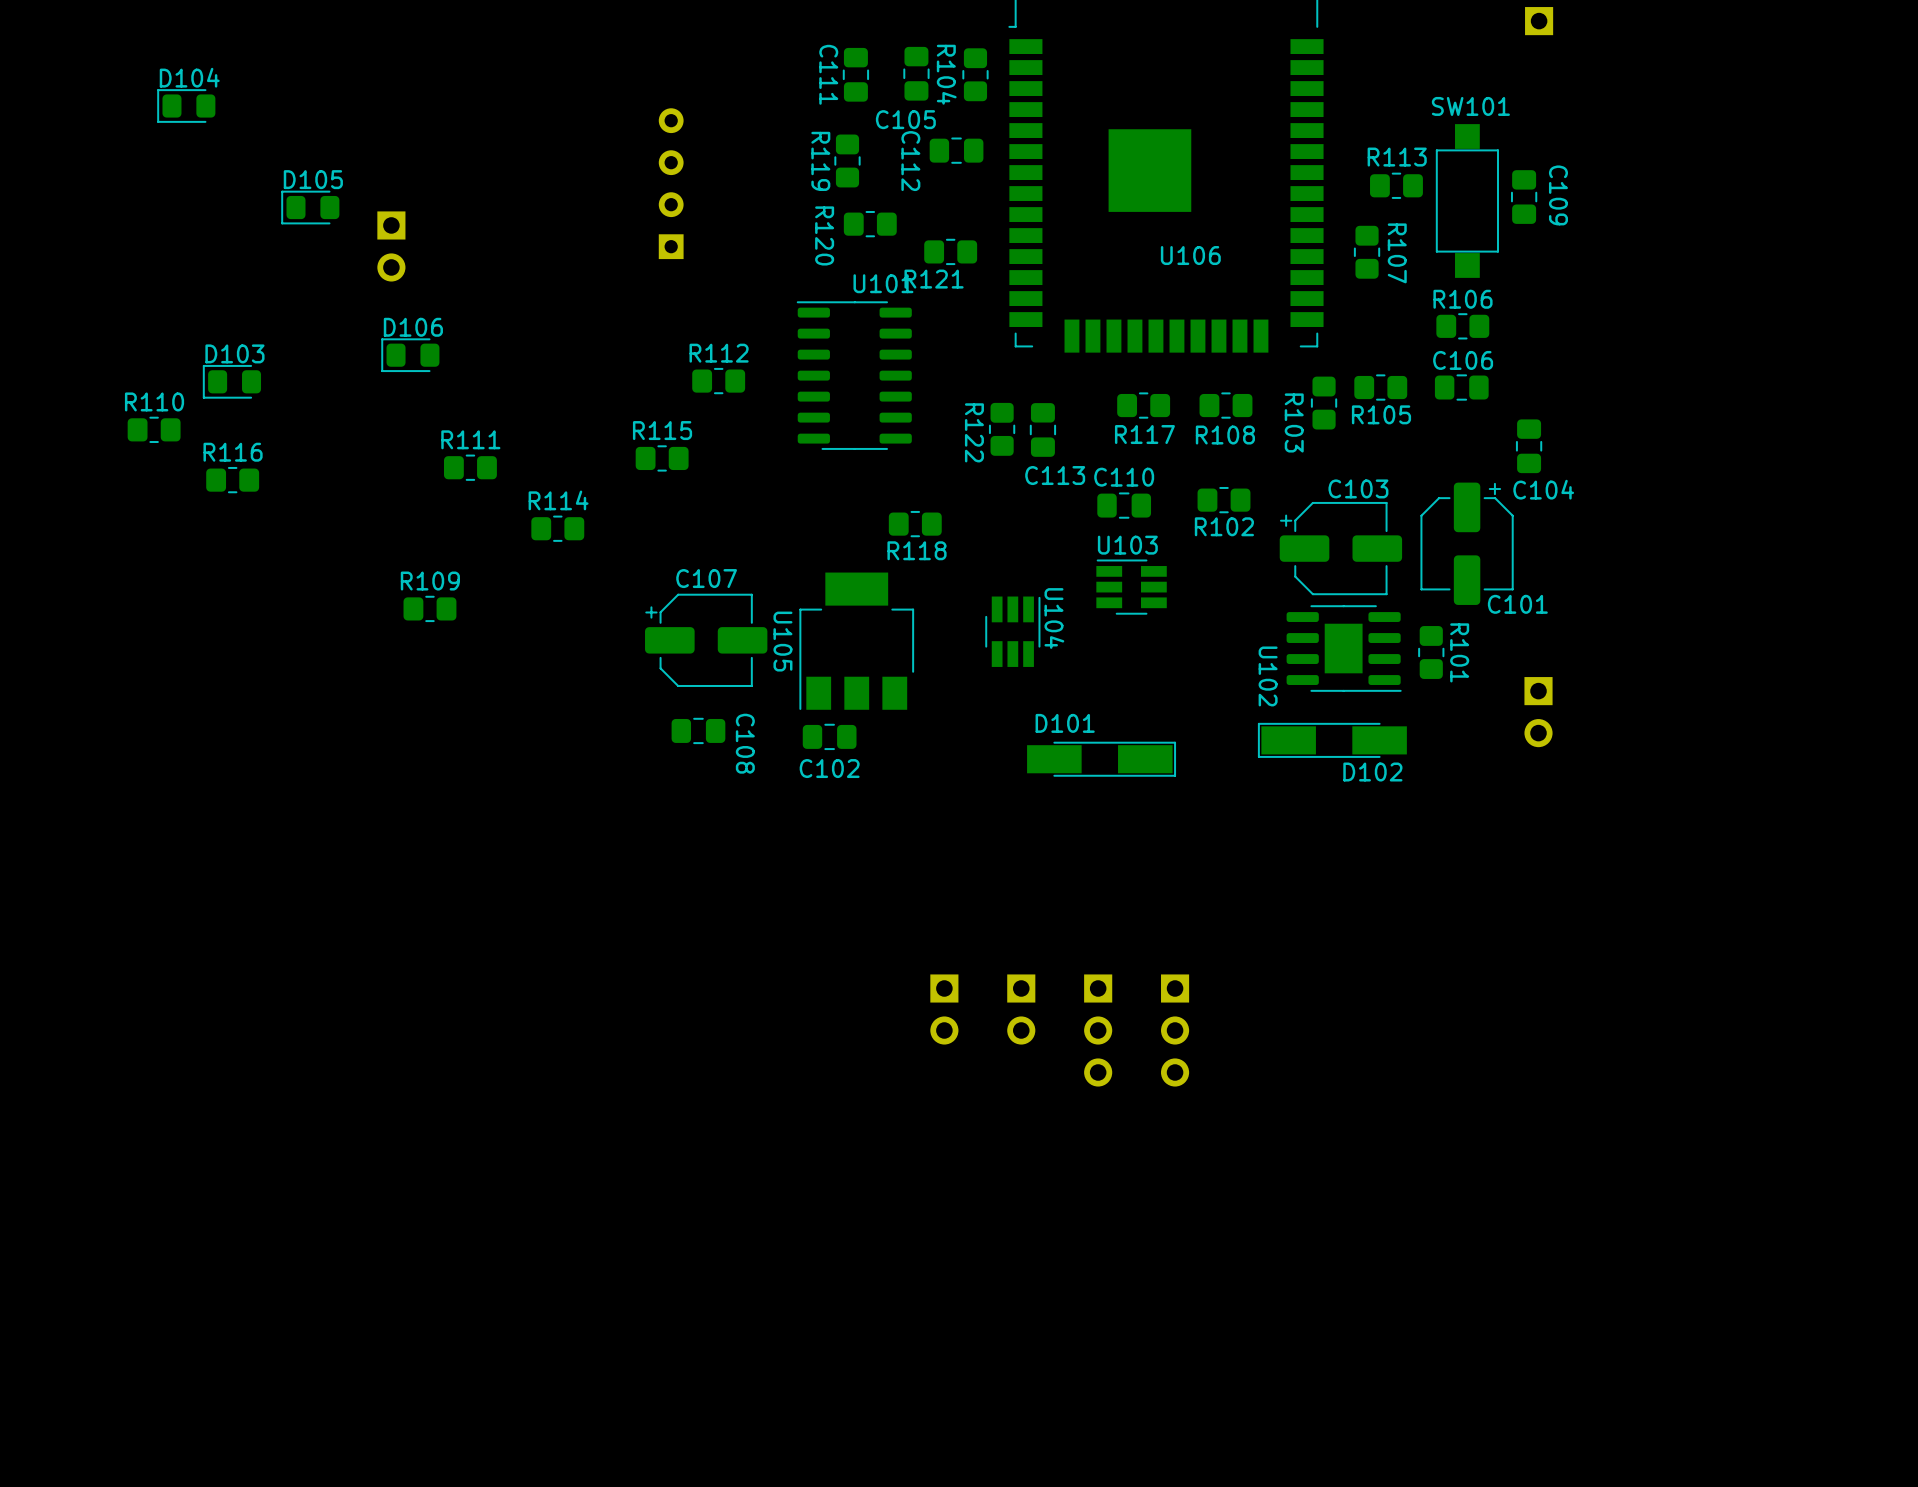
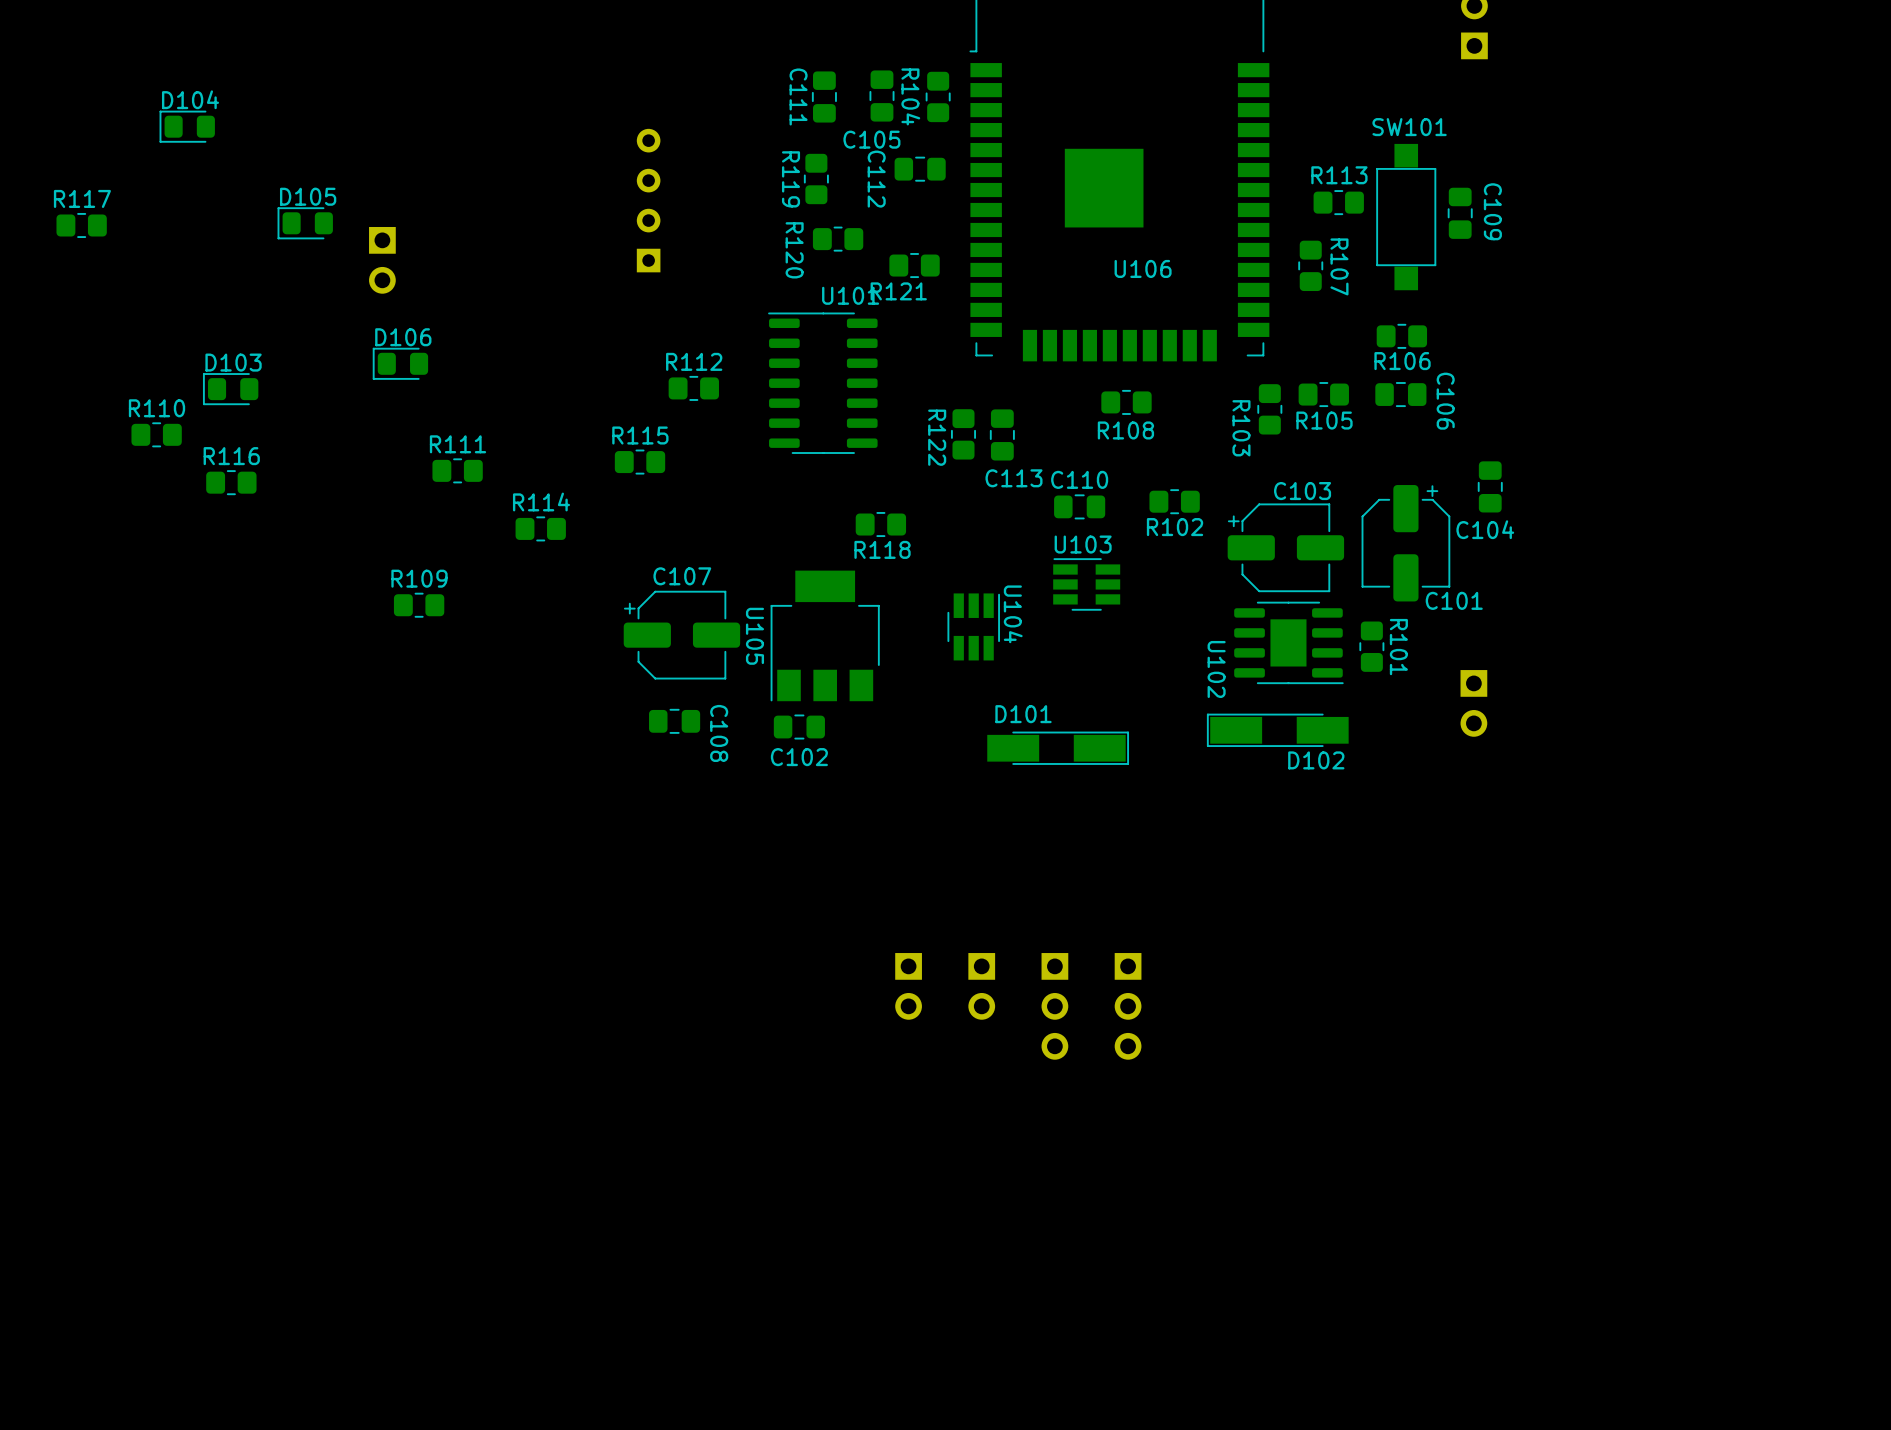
R106 name position: R106 (1463, 299) -> R106 (1402, 361)
C106 name rotation: 0° (1463, 360) -> 90° clockwise (1445, 401)
R117 position: (1143, 405) -> (81, 225)
R108 position: (1225, 405) -> (1126, 402)
R117 name position: R117 (1144, 434) -> R117 (82, 198)
C104 position: (1529, 446) -> (1490, 486)
C104 name position: C104 (1543, 489) -> C104 (1485, 529)

